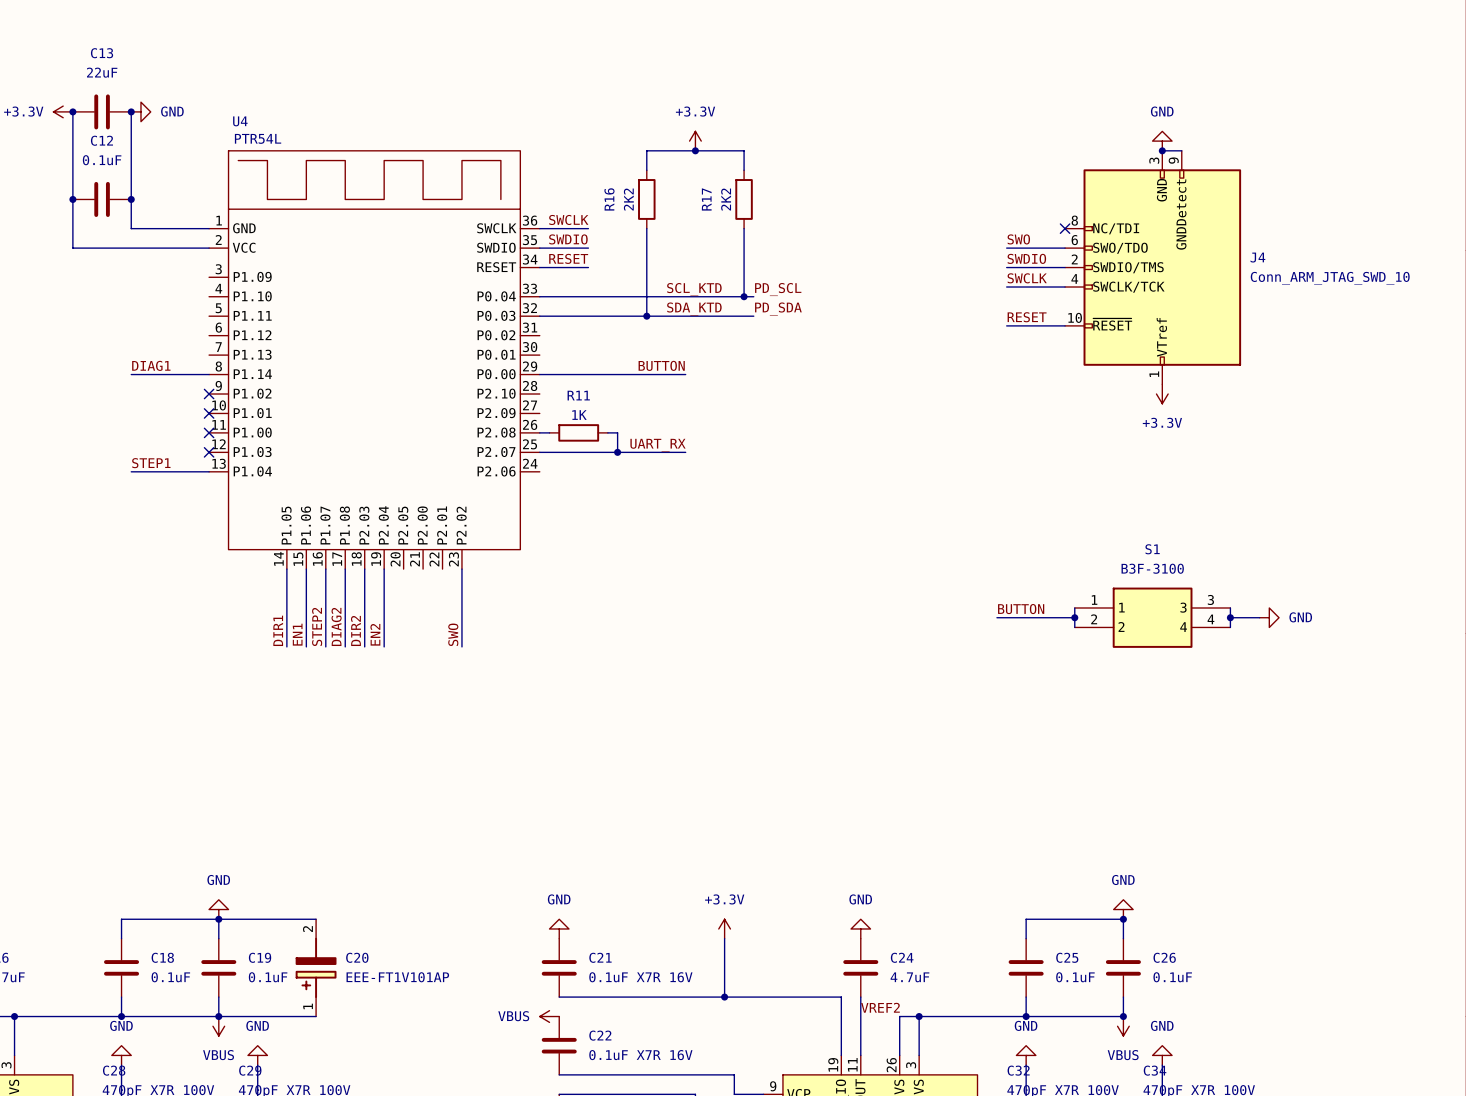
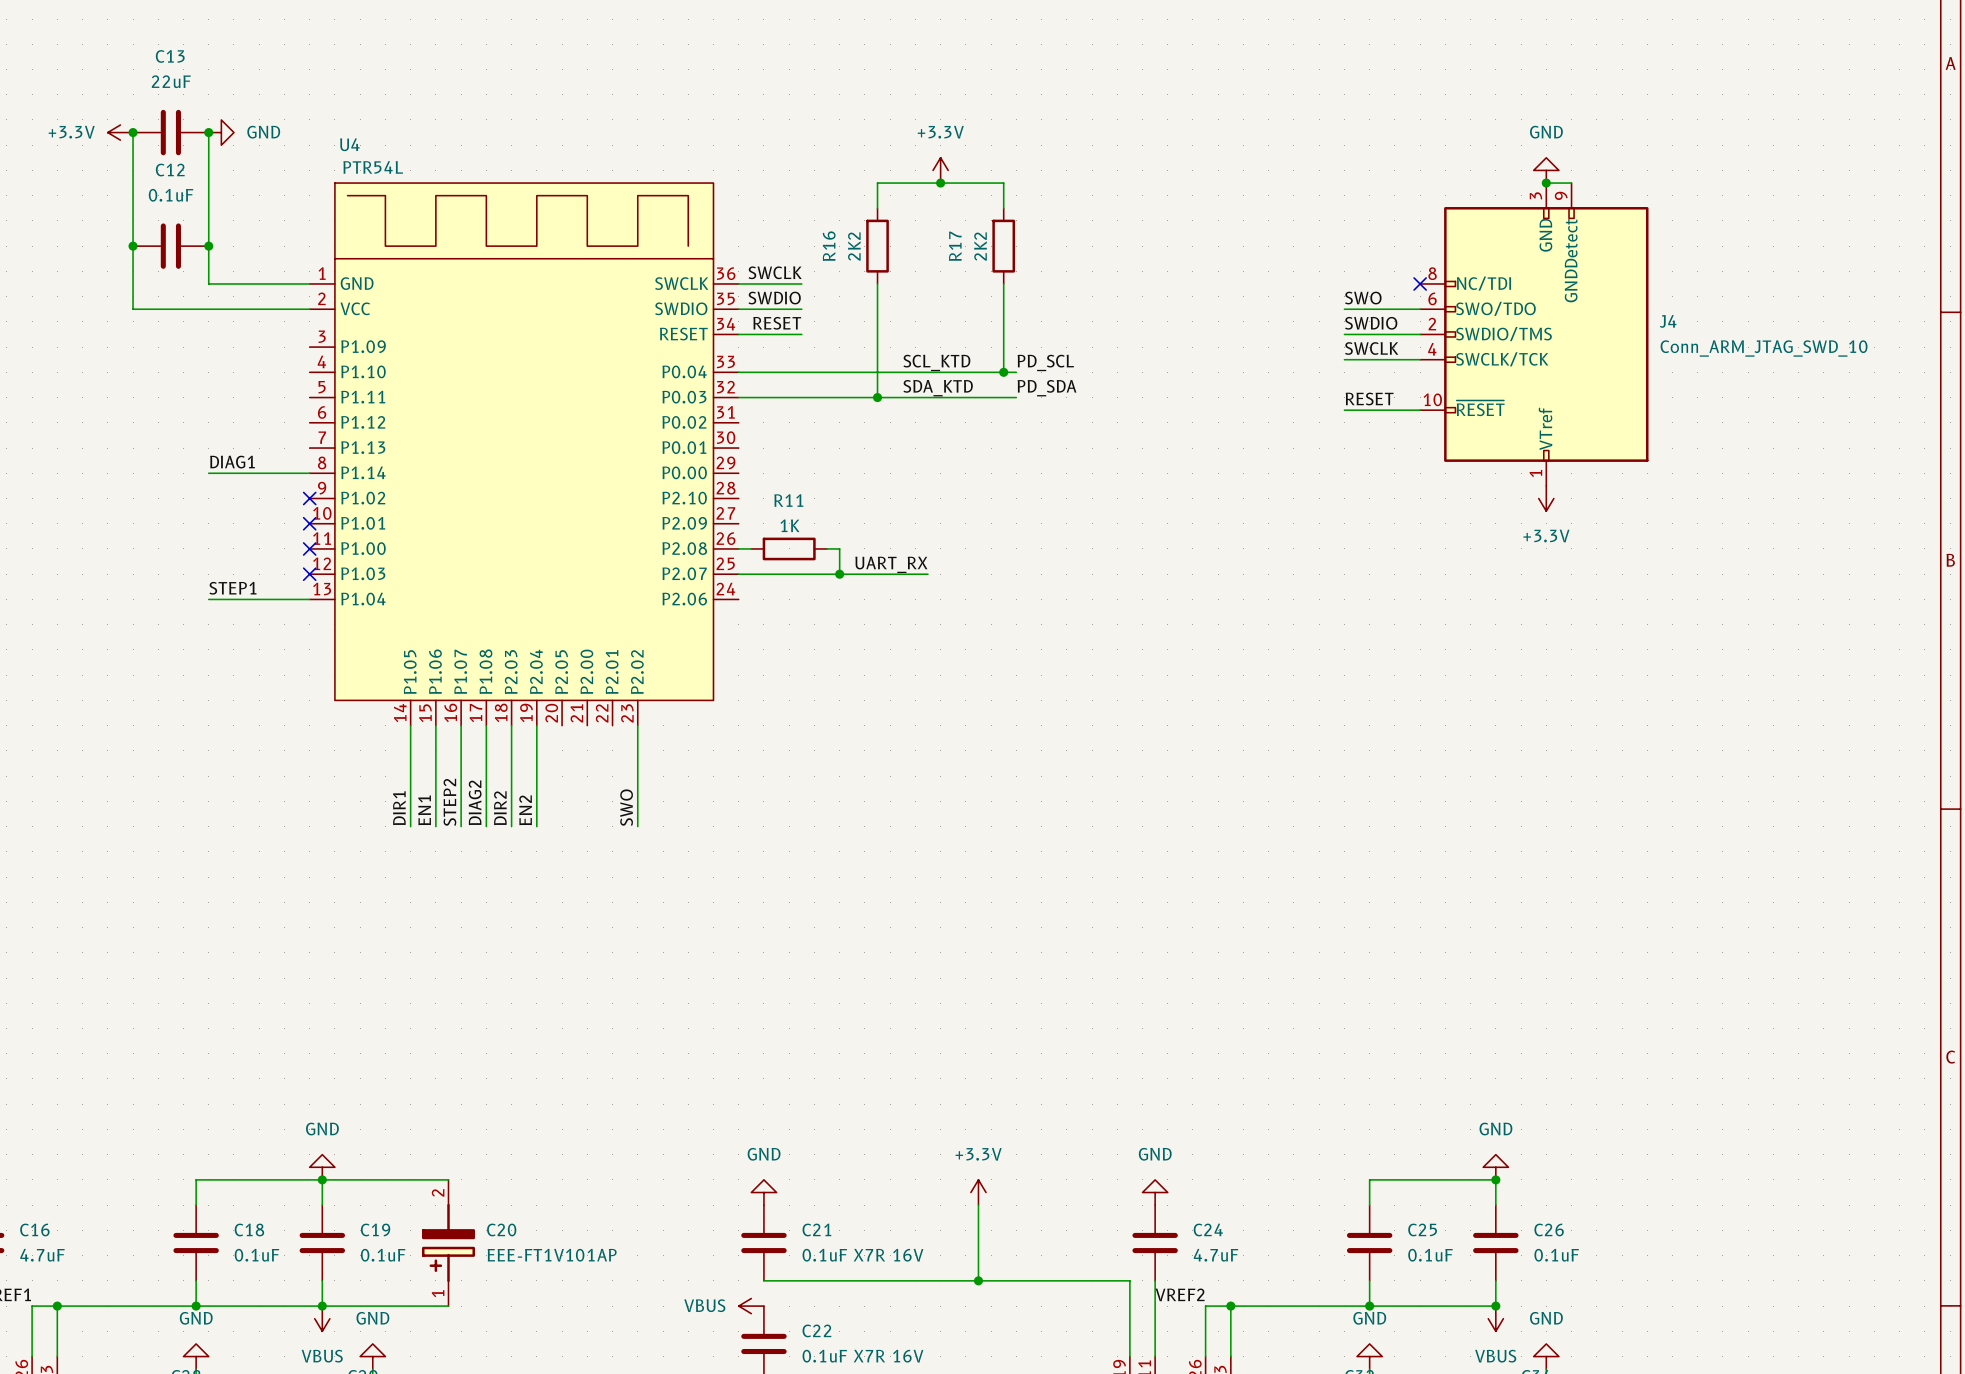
U4 symbol: [209, 150, 540, 570] -> [309, 183, 739, 726]
label: BUTTON (661, 365) -> none
wire: (539, 374) (685, 374) -> none
wire: (1074, 607) (1074, 627) -> none
wire: (1230, 607) (1230, 627) -> none
label: BUTTON (1021, 609) -> none
wire: (996, 617) (1074, 617) -> none
junction: (1074, 617) -> none
S1: B3F-3100 (1152, 617) -> none
wire: (1230, 617) (1259, 617) -> none
junction: (1230, 617) -> none
power symbol: GND (1269, 617) -> none

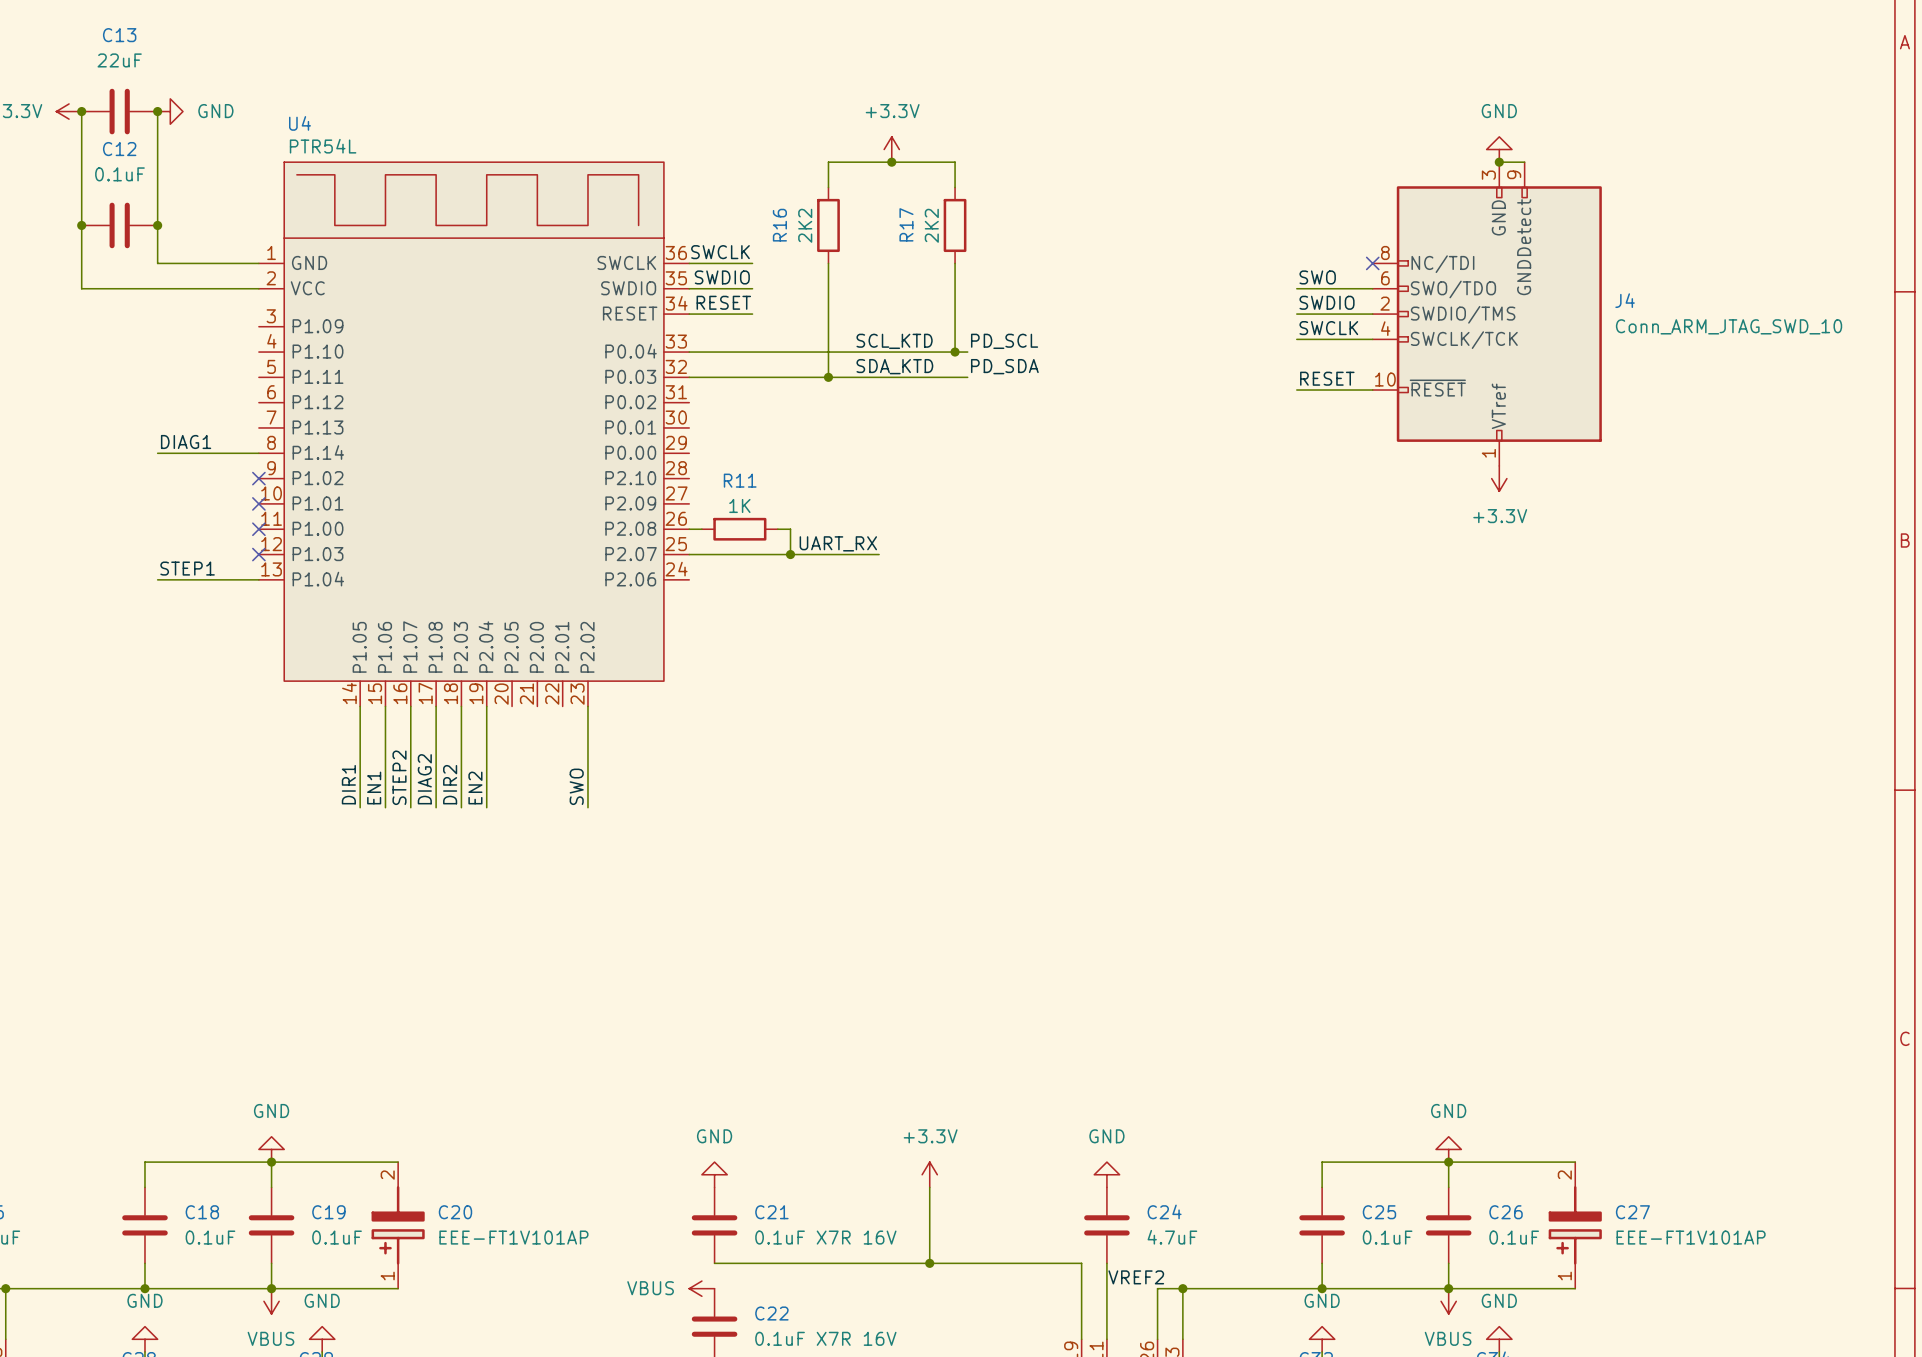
wire: none -> (1448, 1162) (1575, 1162)
C27: none -> EEE-FT1V101AP (1575, 1225)
wire: none -> (1448, 1288) (1575, 1288)

